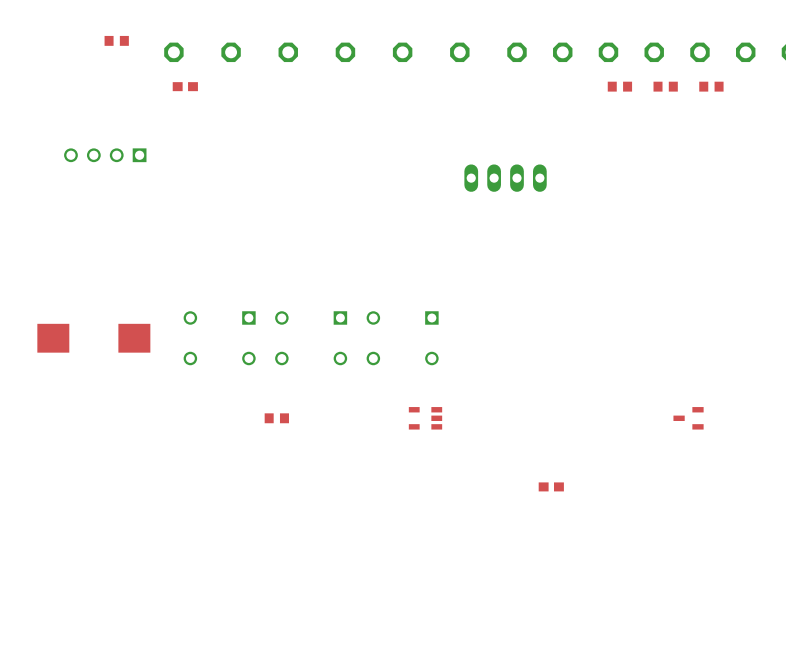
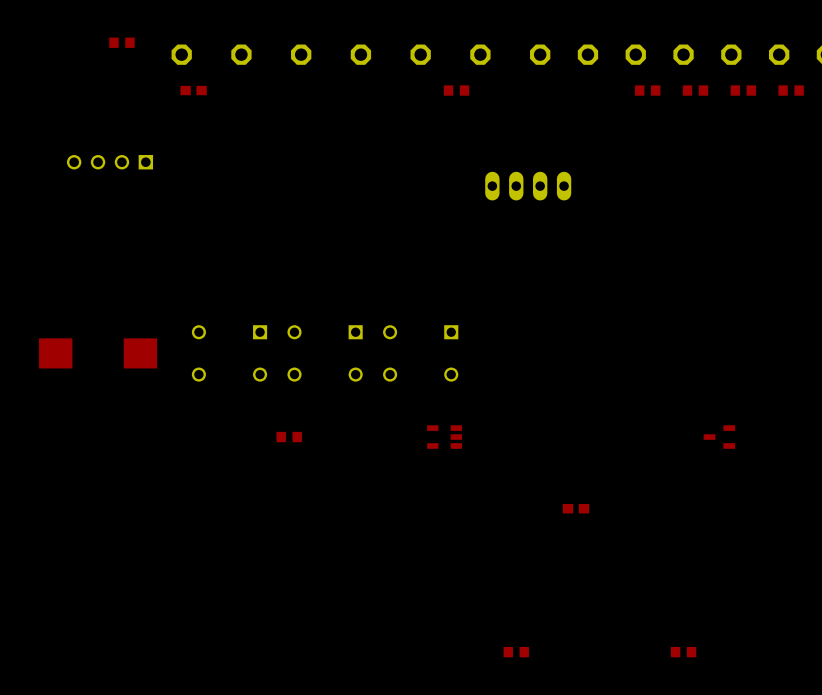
part: none -> (456, 90)
part: none -> (791, 90)
part: none -> (516, 652)
part: none -> (683, 652)

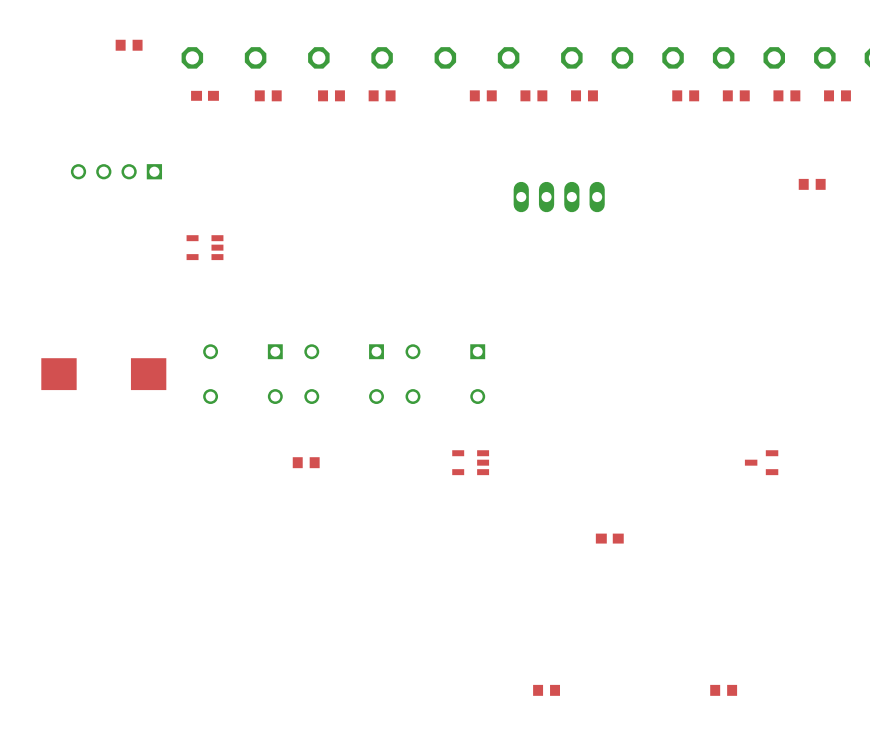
part: none -> (268, 95)
part: none -> (331, 95)
part: none -> (382, 95)
part: none -> (533, 95)
part: none -> (584, 95)
part: none -> (812, 184)
part: none -> (205, 247)

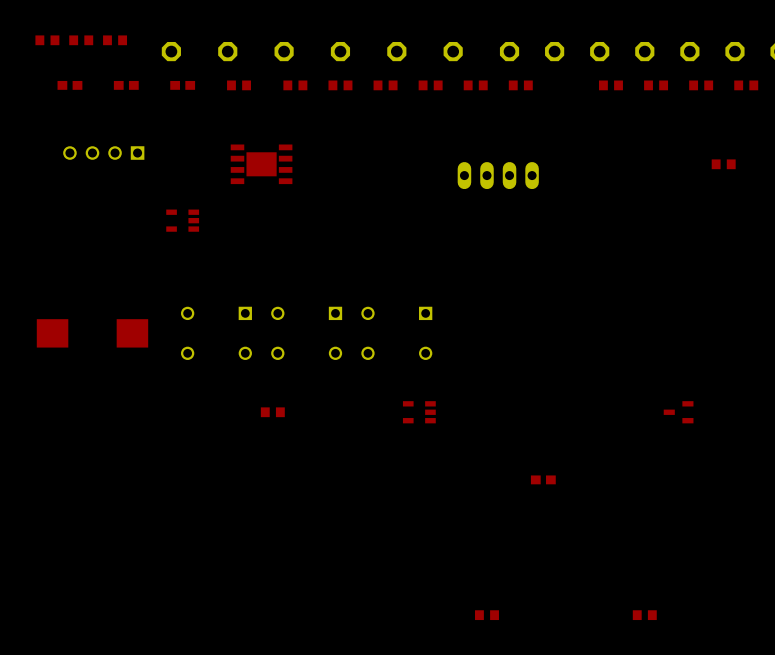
part: none -> (47, 40)
part: none -> (81, 40)
part: none -> (69, 85)
part: none -> (126, 85)
part: none -> (385, 85)
part: none -> (261, 164)

